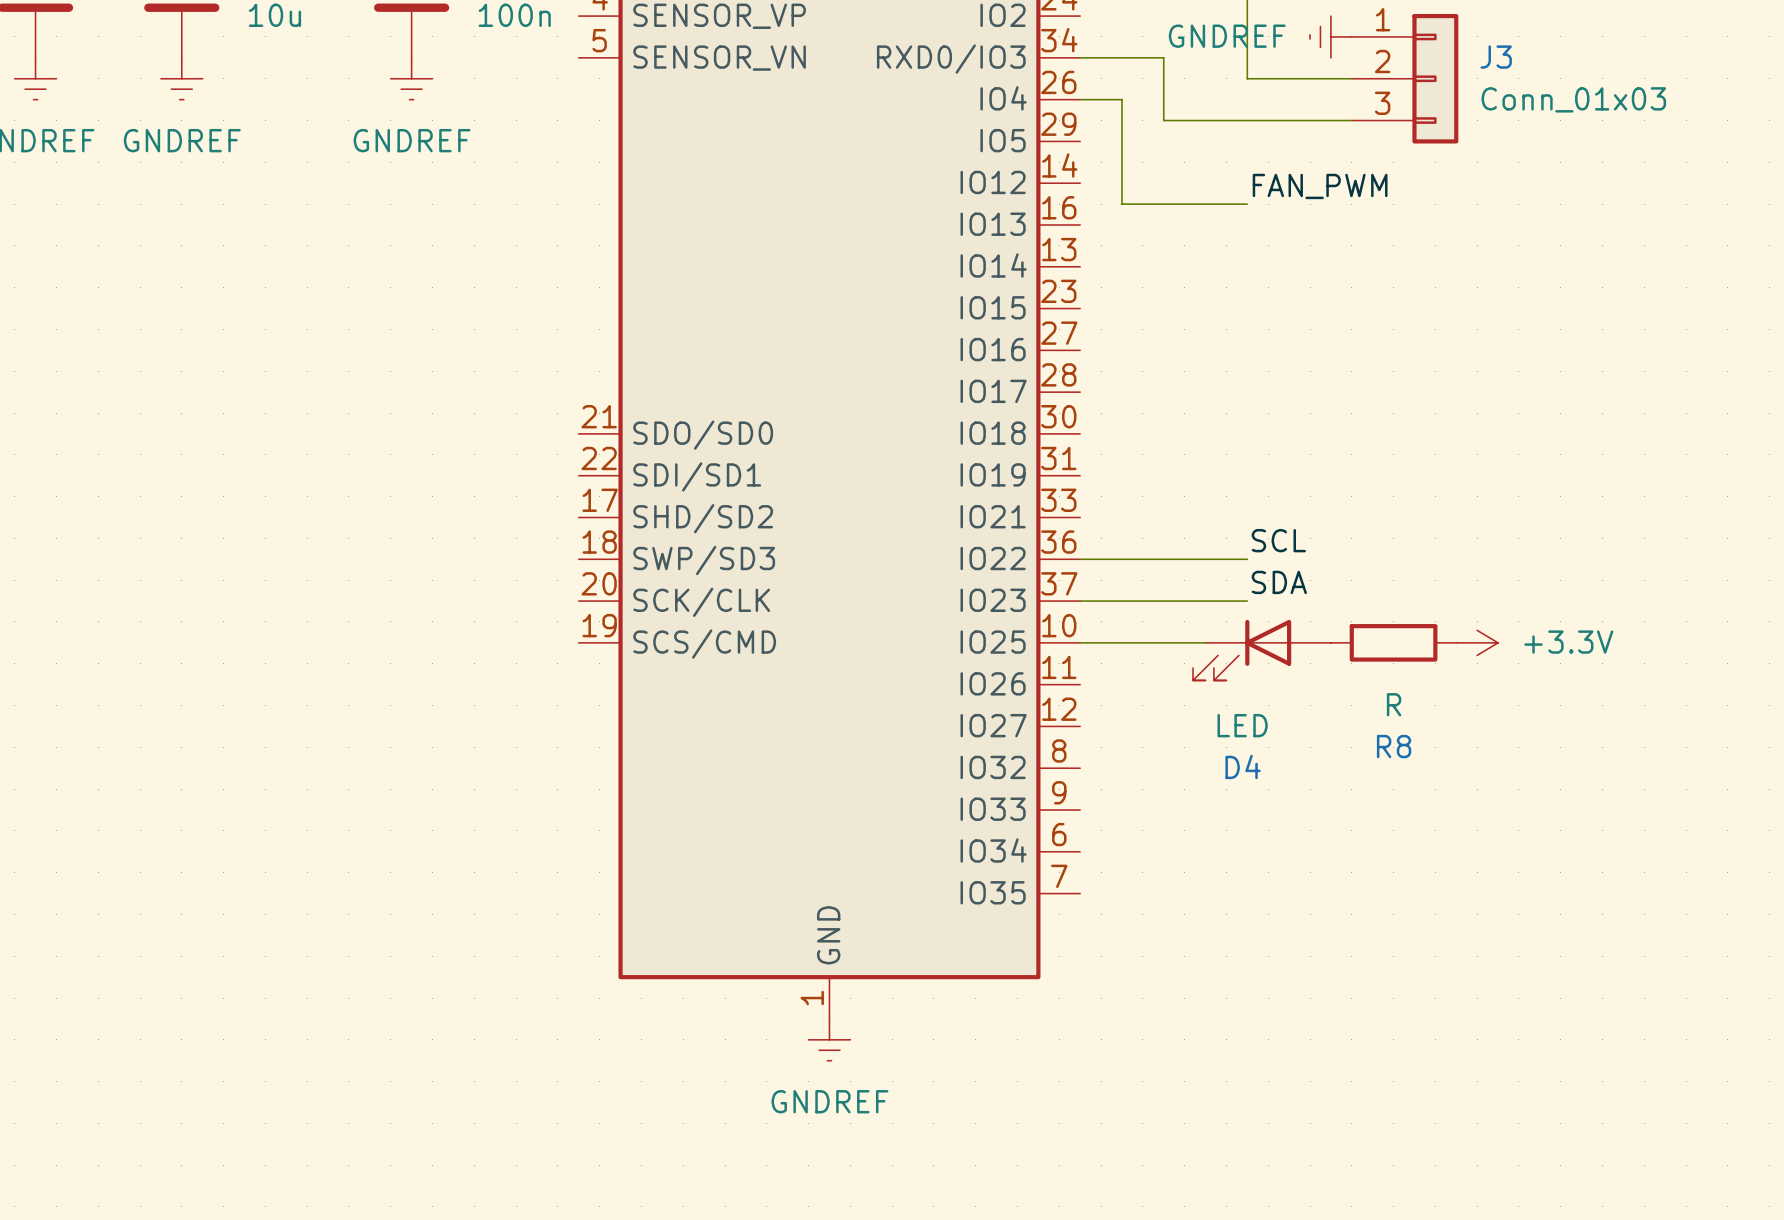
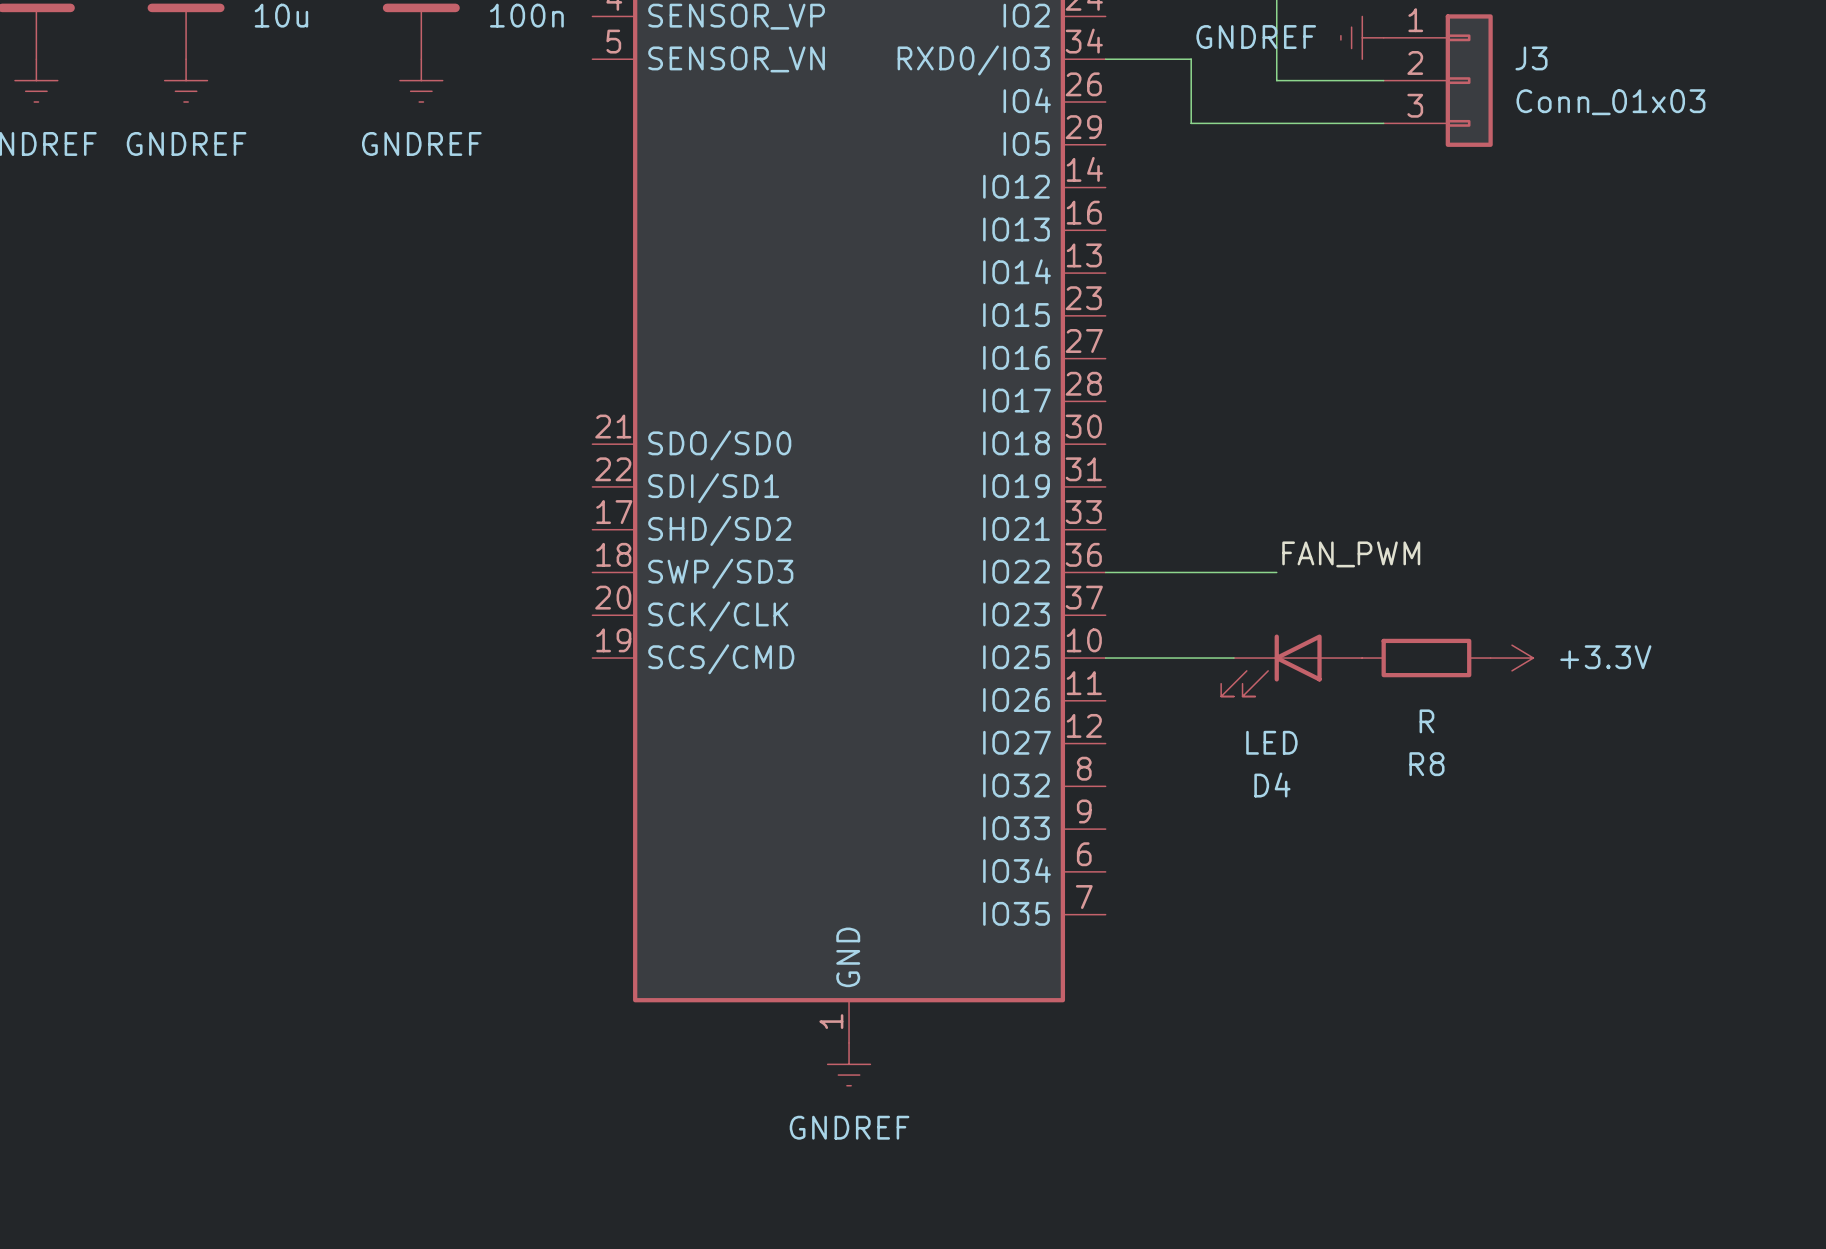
wire: (1080, 99) (1121, 99) (1121, 204) (1247, 204) -> none
label: FAN_PWM (1320, 186) -> none
label: SCL (1278, 540) -> FAN_PWM (1351, 554)
label: SDA (1279, 582) -> none
wire: (1080, 601) (1247, 601) -> none

